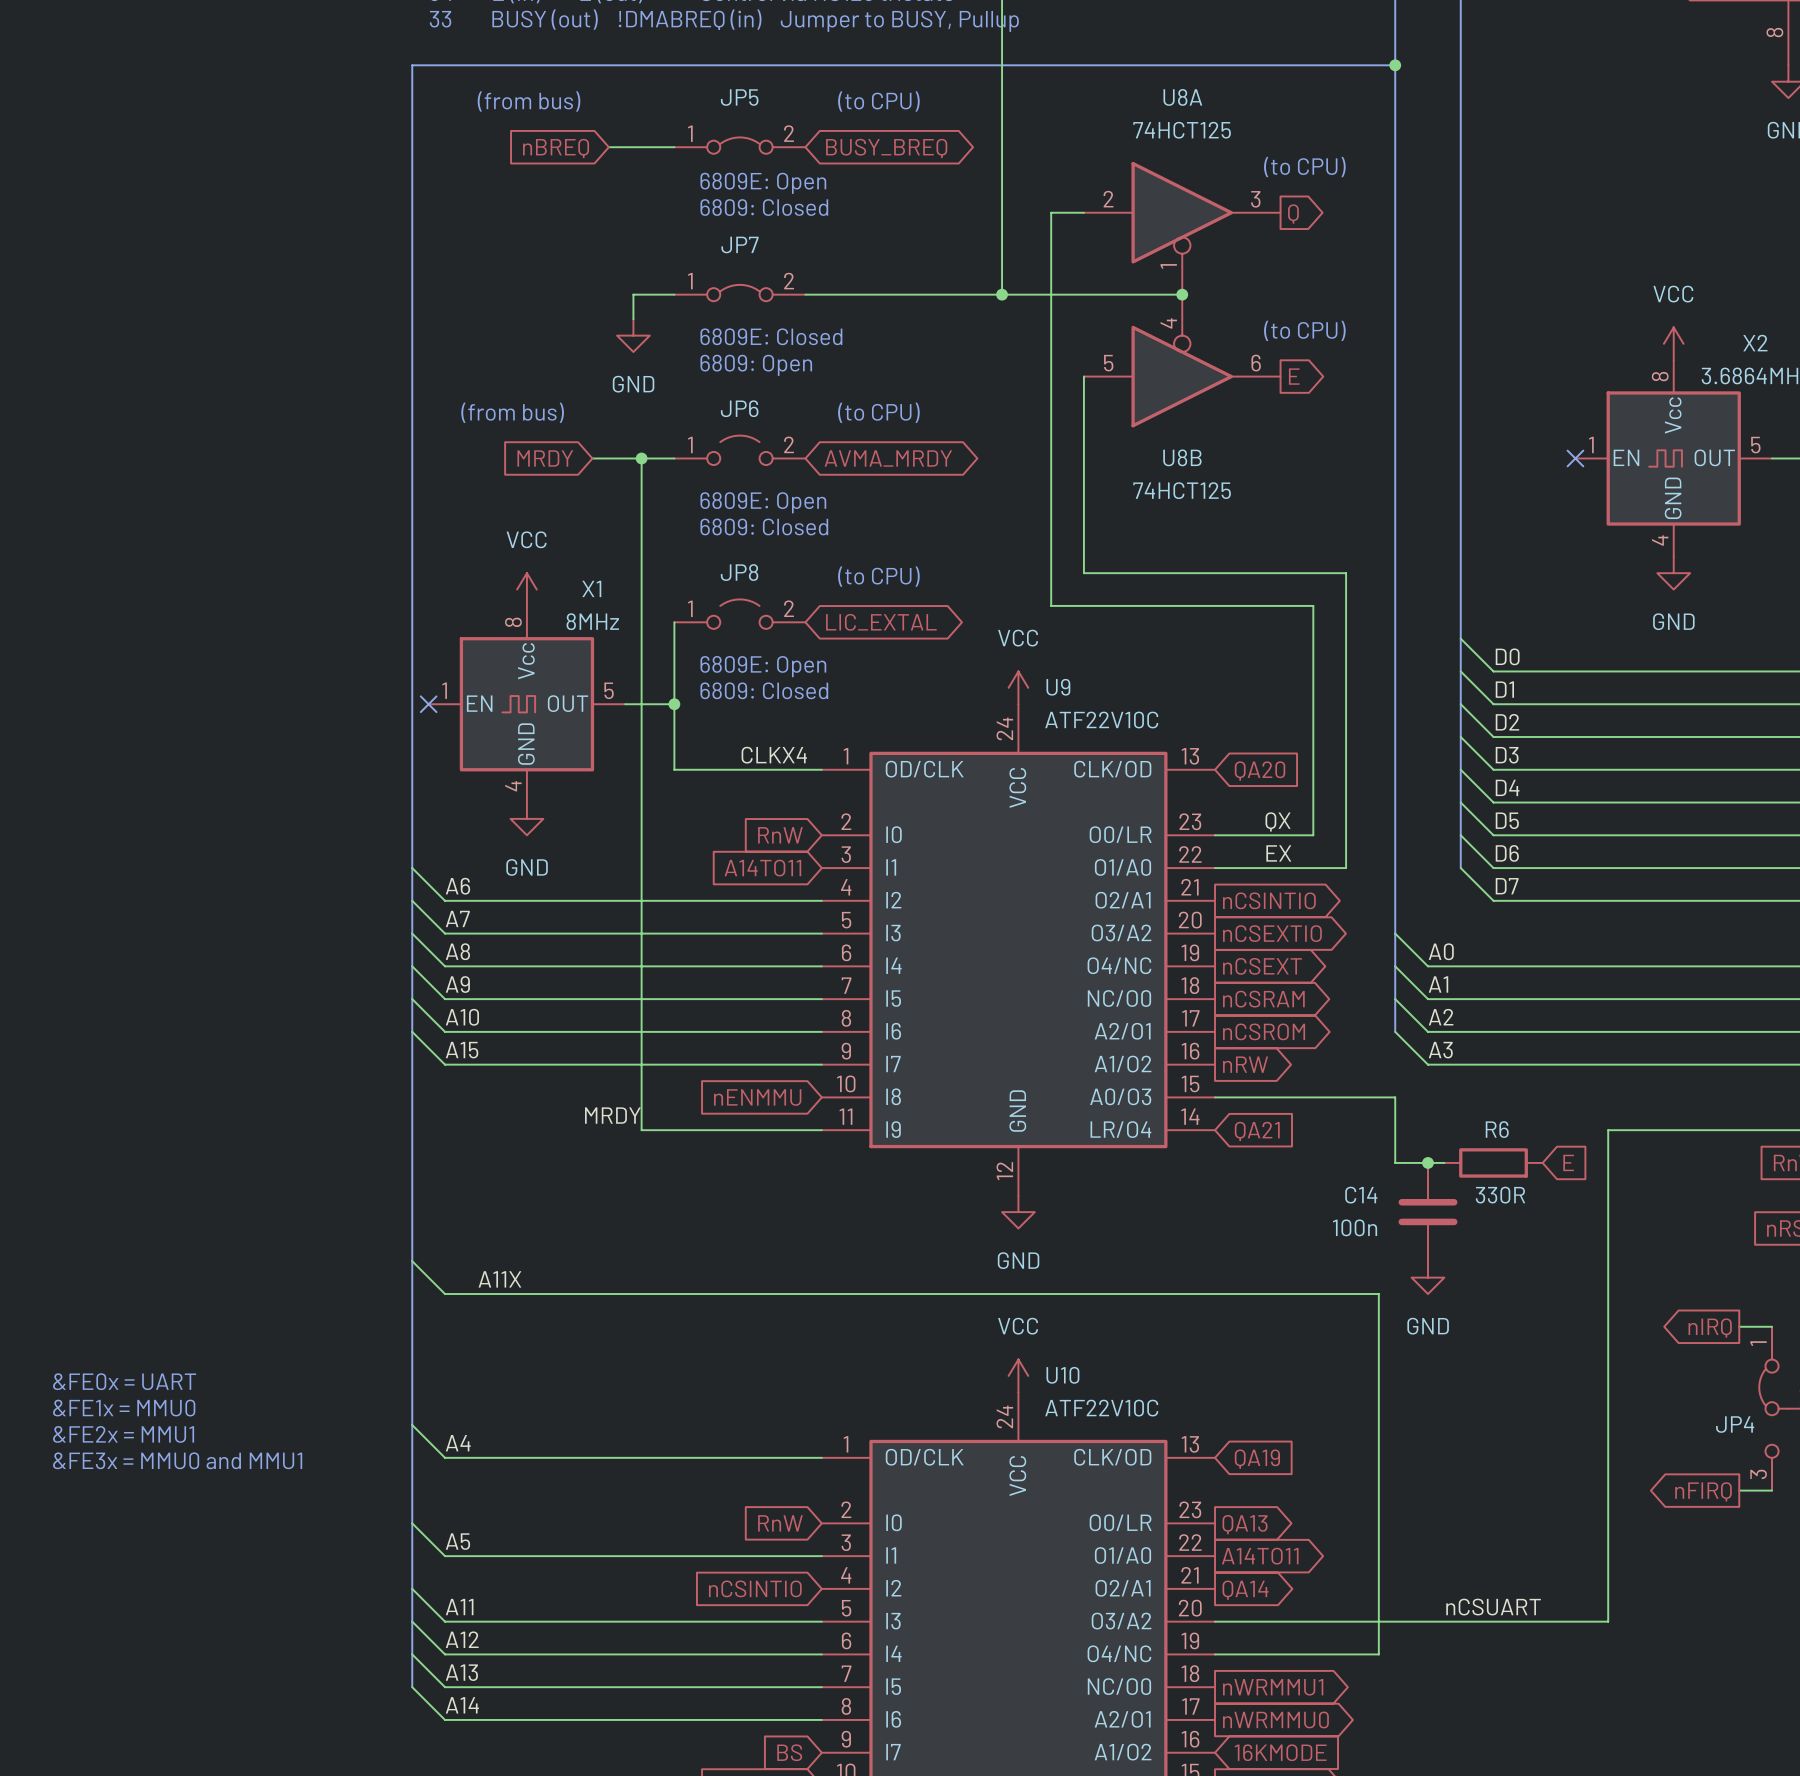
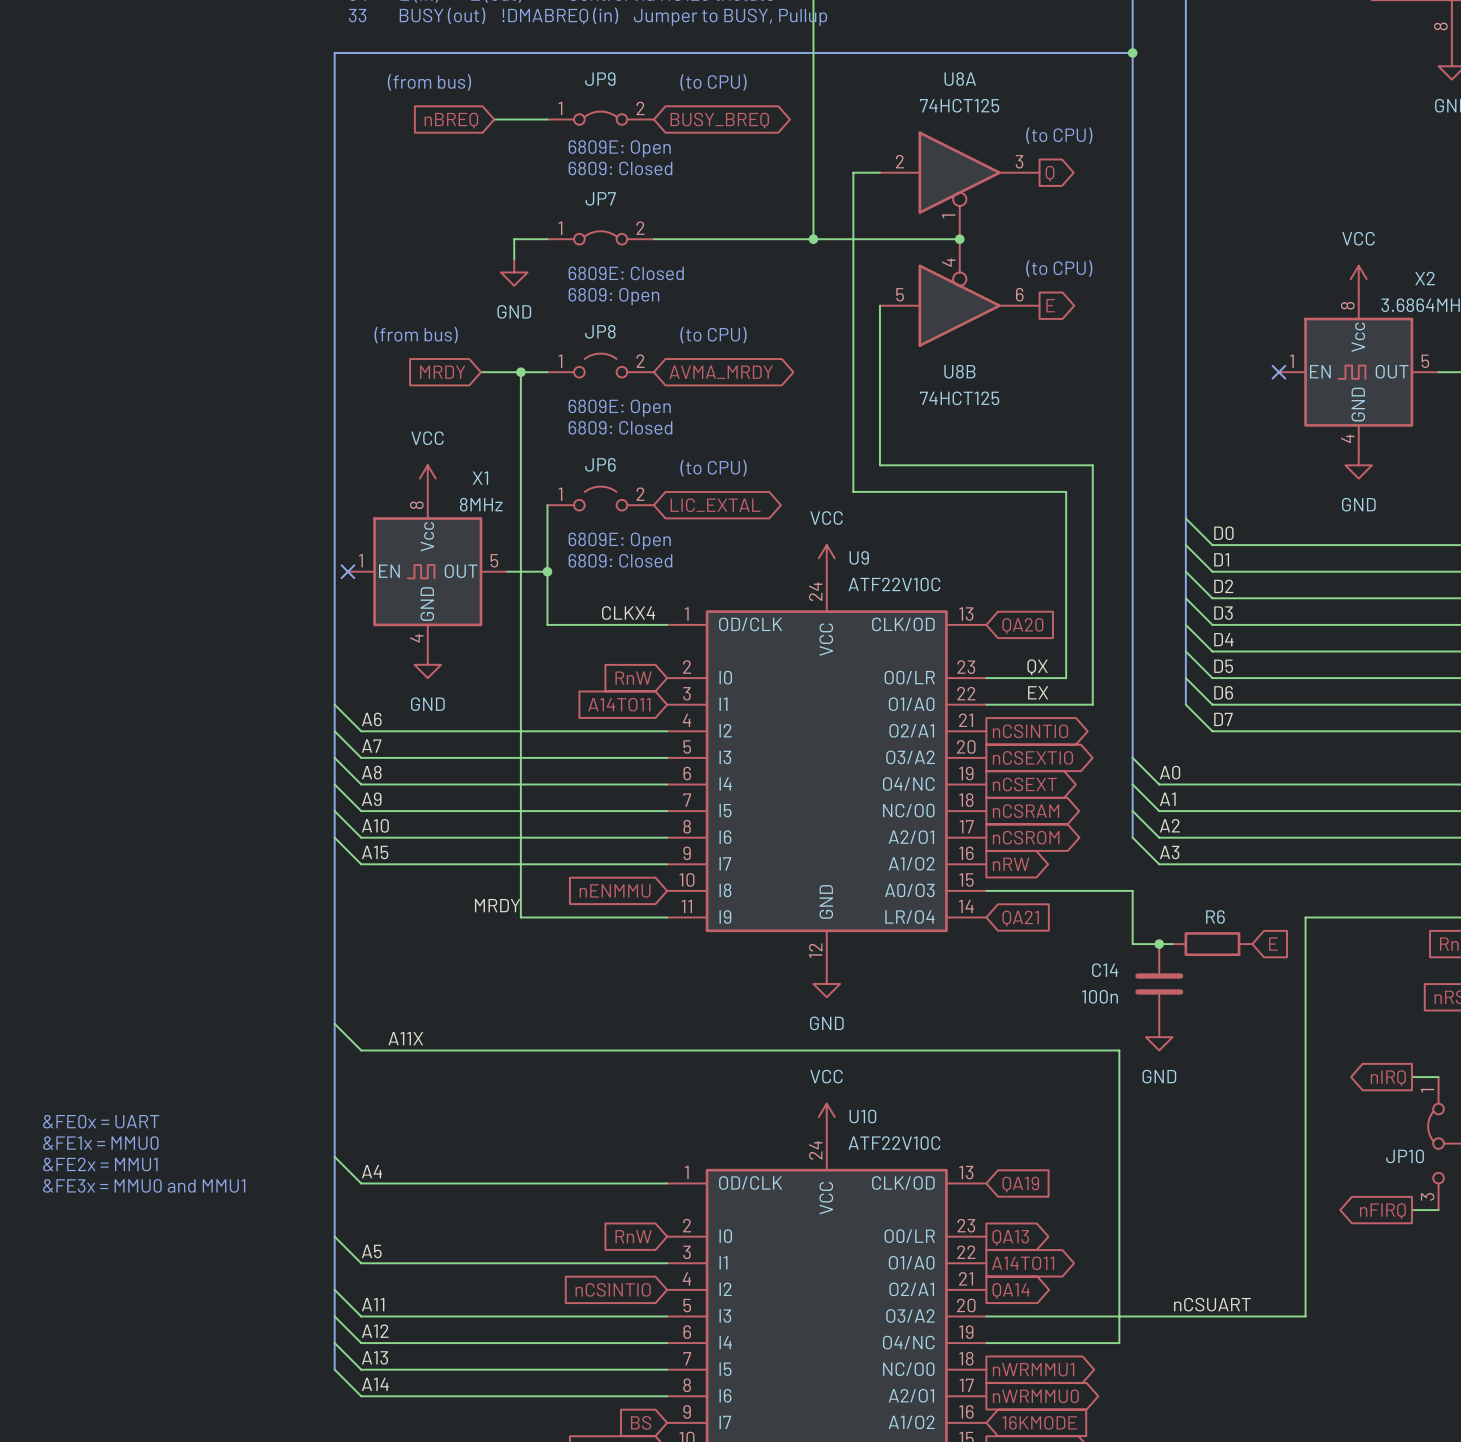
JP5 name: JP5 (739, 97) -> JP9 (600, 79)
JP6 name: JP6 (739, 408) -> JP8 (600, 331)
JP8 name: JP8 (739, 572) -> JP6 (600, 464)
R6 value: 330R (1500, 1195) -> none
JP4 name: JP4 (1735, 1424) -> JP10 (1405, 1156)

